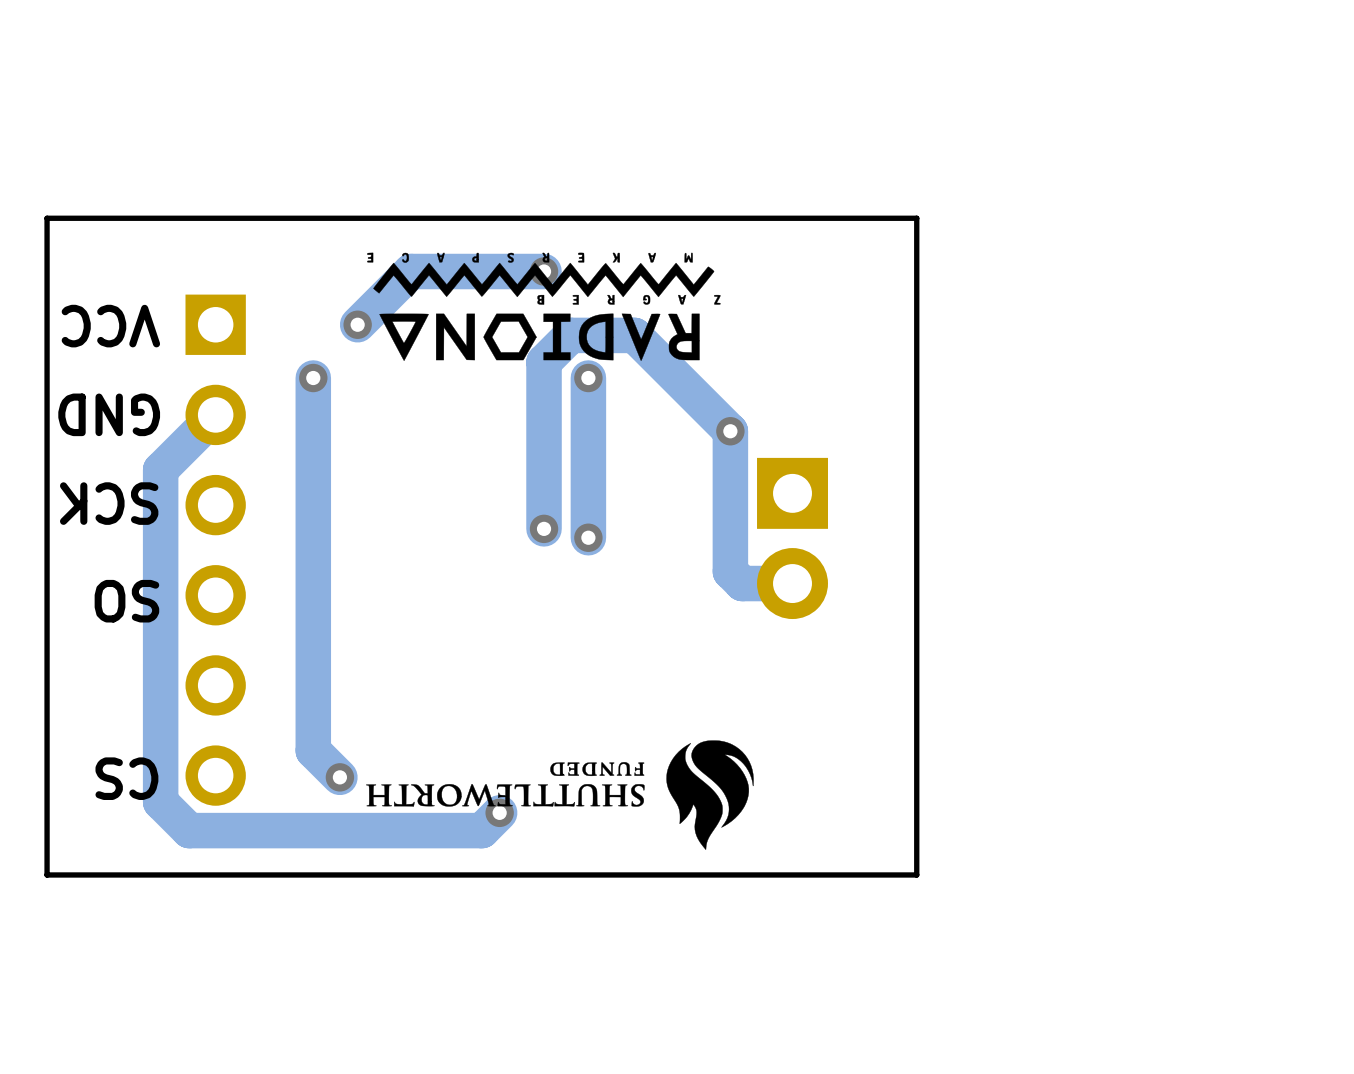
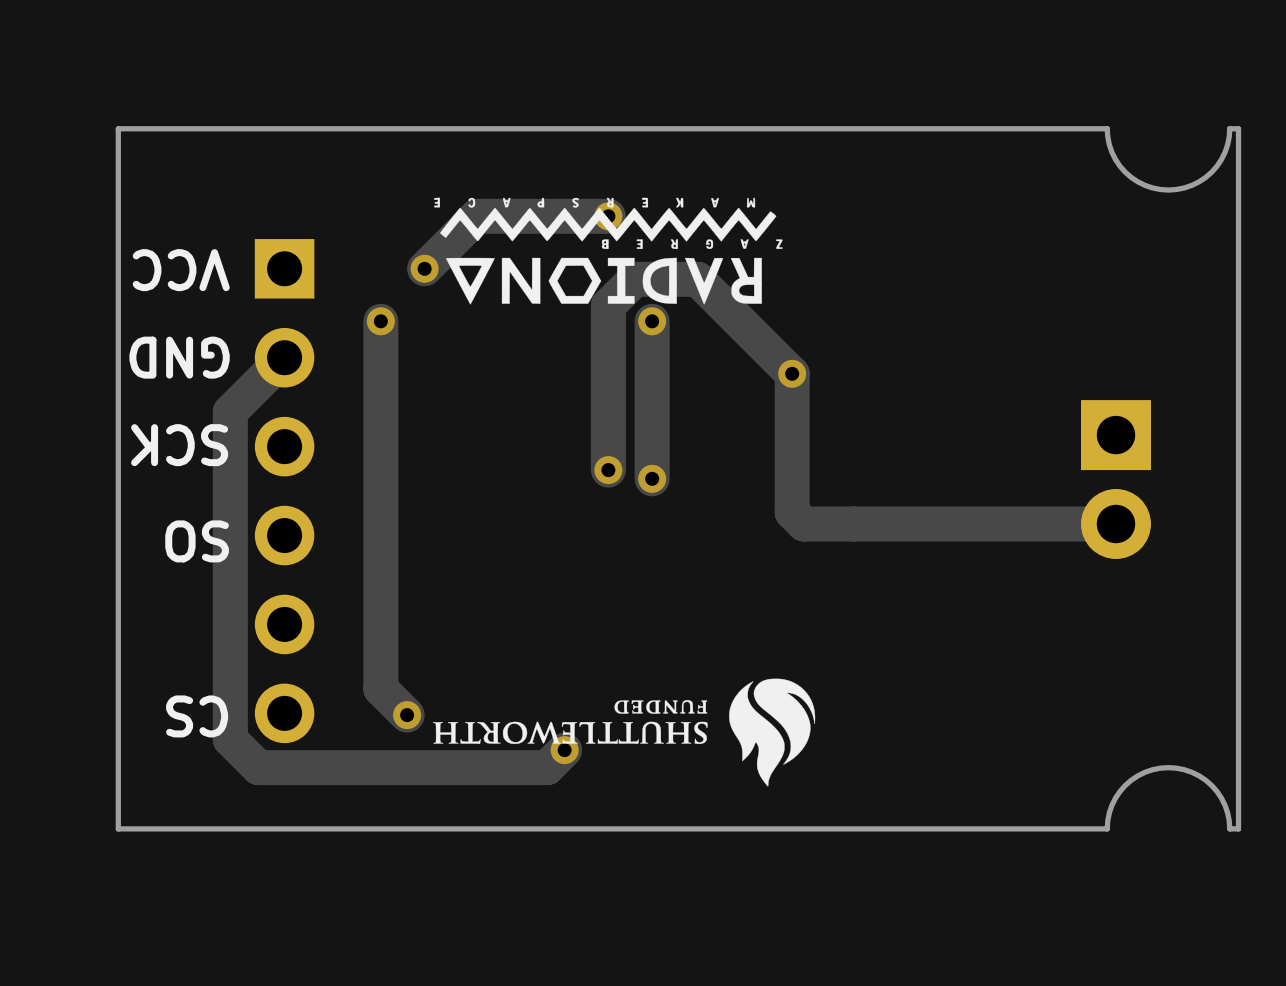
board edge: (47, 218) (916, 218) (916, 874) (47, 874) -> (118, 163) (118, 128) (1107, 128) (1111, 152) (1125, 172) (1145, 185) (1168, 190) (1184, 187) (1205, 177) (1221, 159) (1227, 144) (1229, 128) (1238, 128) (1238, 828) (1229, 828) (1227, 813) (1221, 798) (1205, 780) (1184, 769) (1168, 767) (1145, 772) (1125, 785) (1111, 805) (1107, 828) (118, 828) (118, 811)
part position: (792, 538) -> (1115, 479)
track: none -> (1115, 523) (853, 523)

